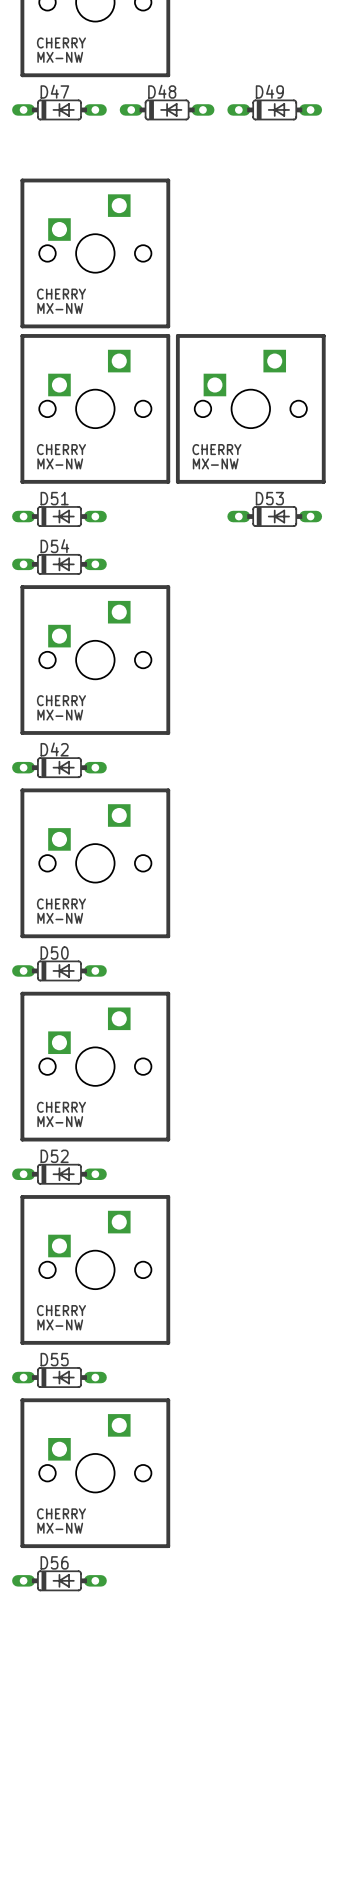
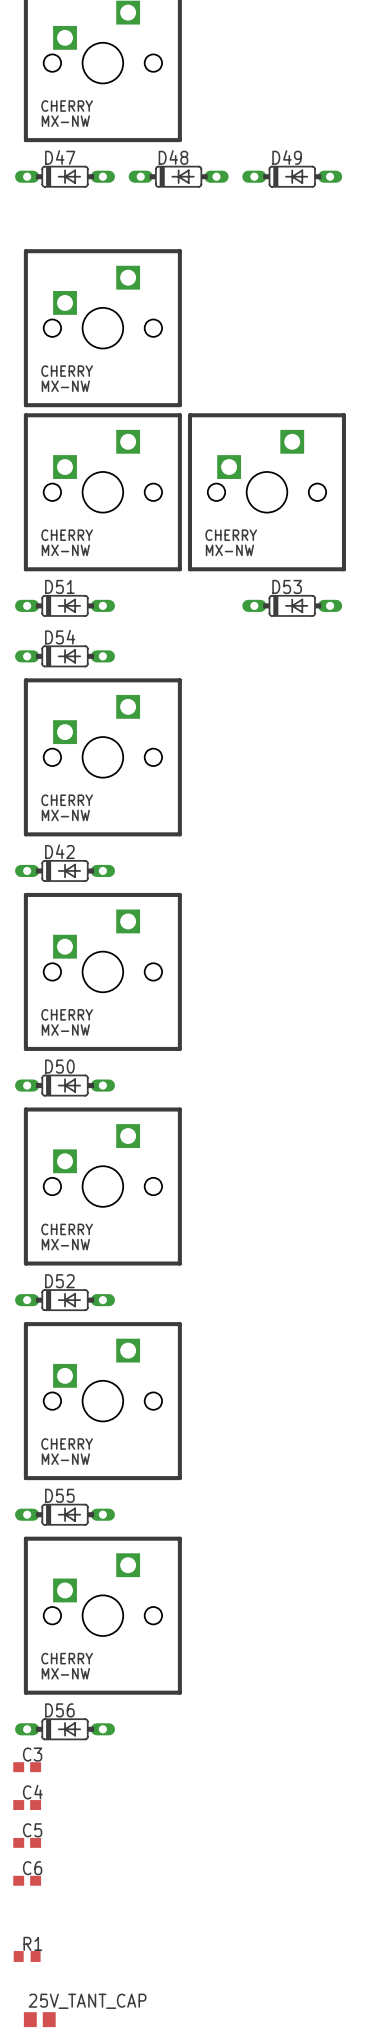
C3: none -> (27, 1767)
C4: none -> (27, 1805)
C5: none -> (27, 1842)
C6: none -> (27, 1880)
R1: none -> (27, 1956)
25V_TANT_CAP: none -> (39, 2019)

